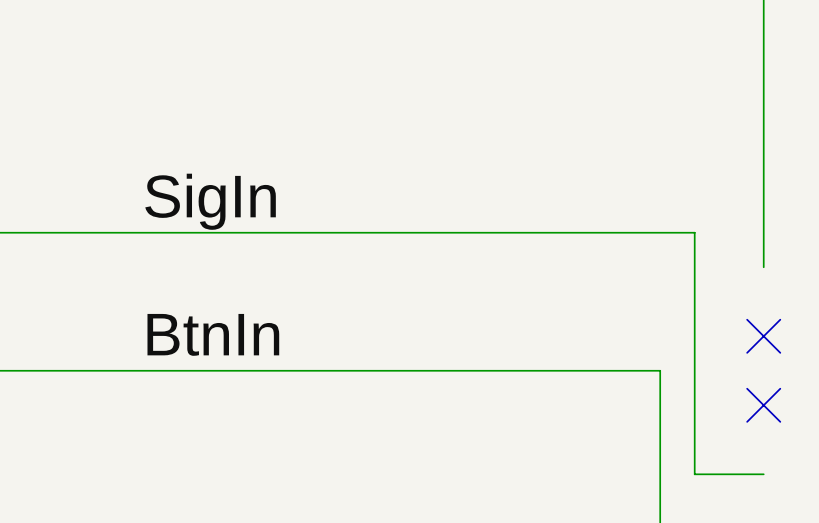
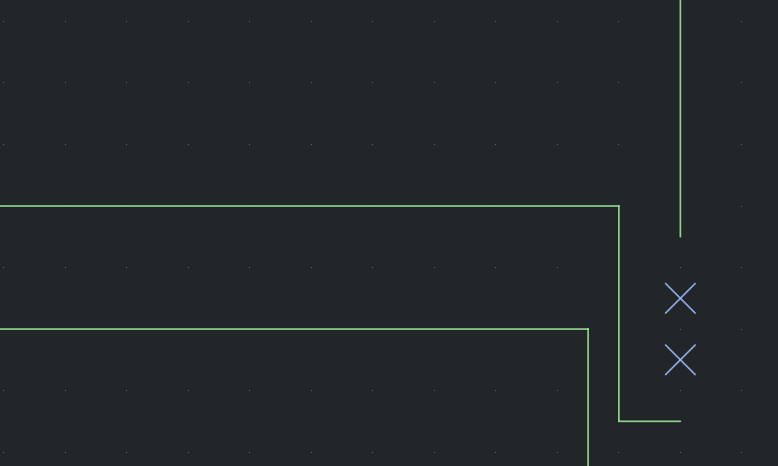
label: SigIn (210, 201) -> none
label: BtnIn (213, 334) -> none

